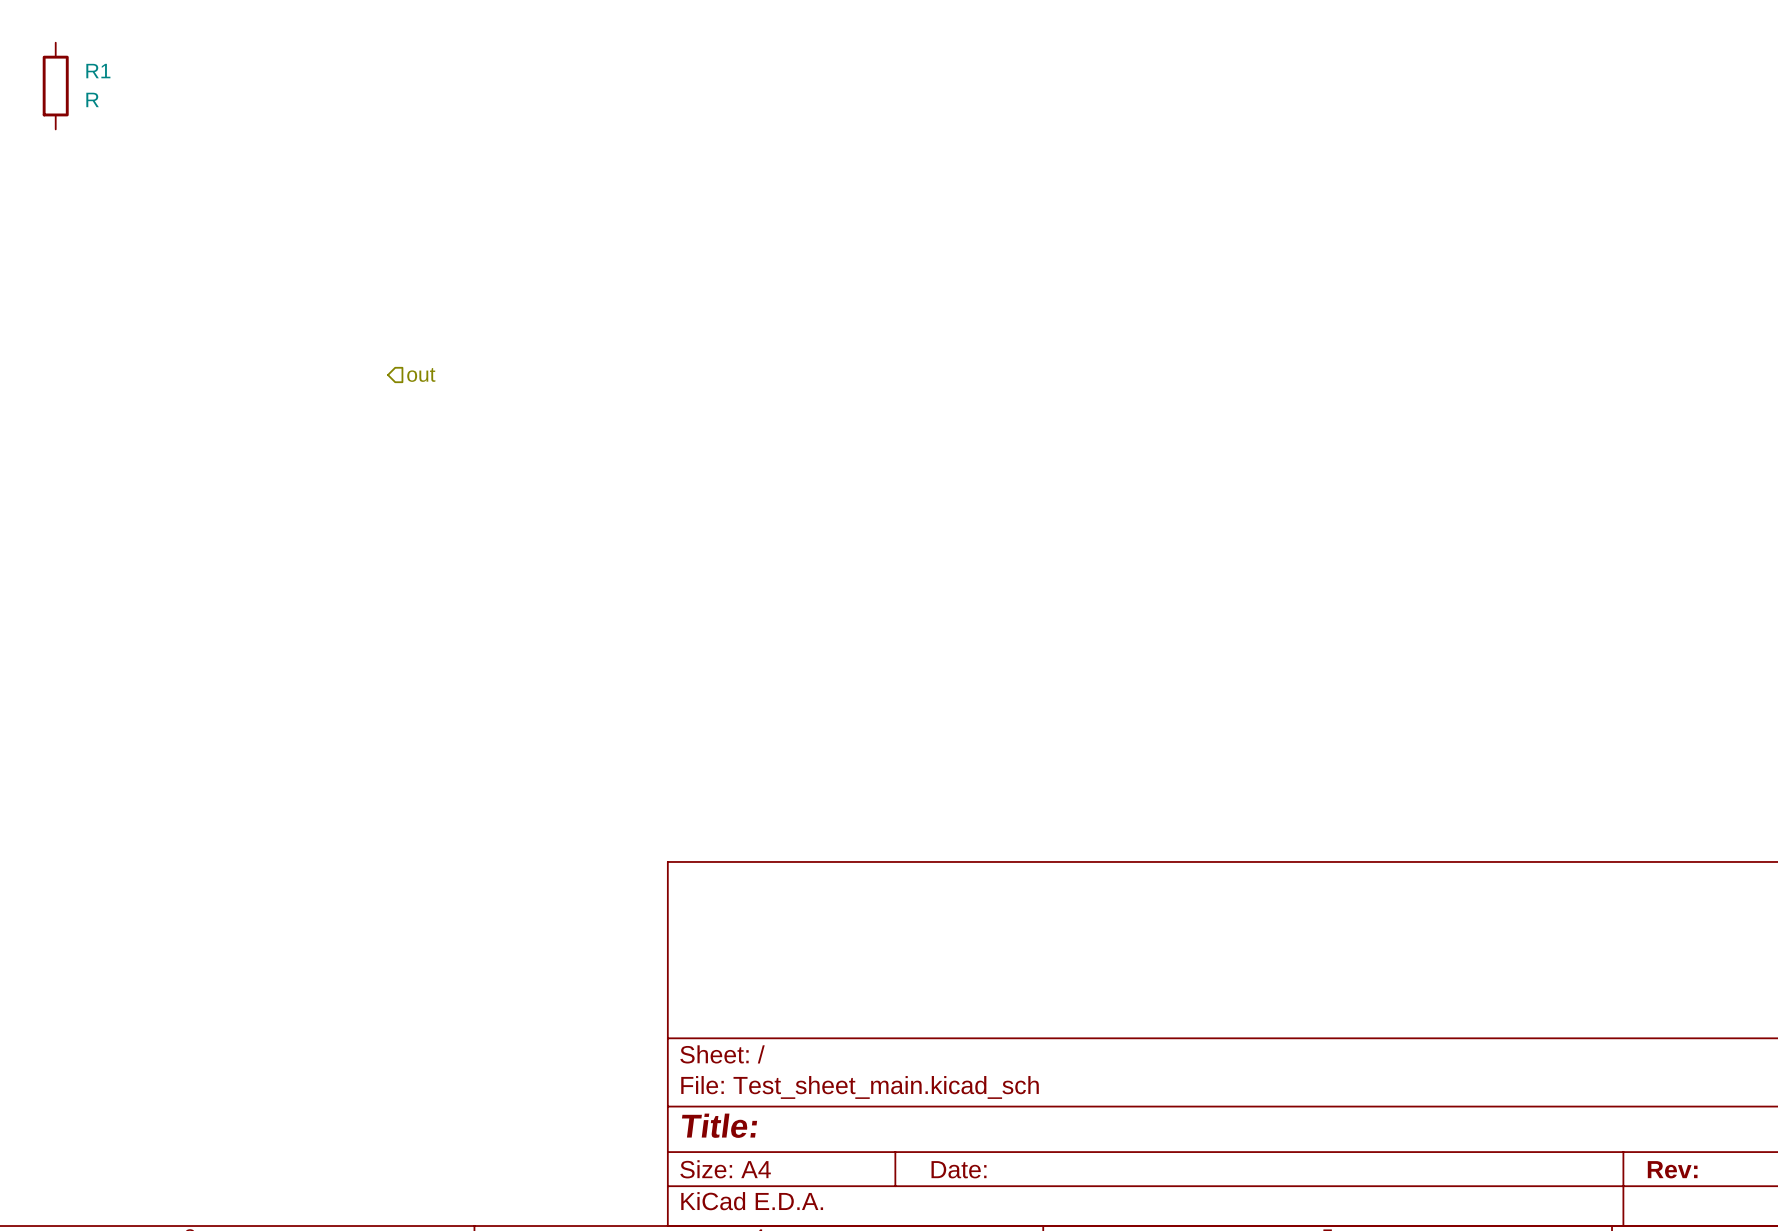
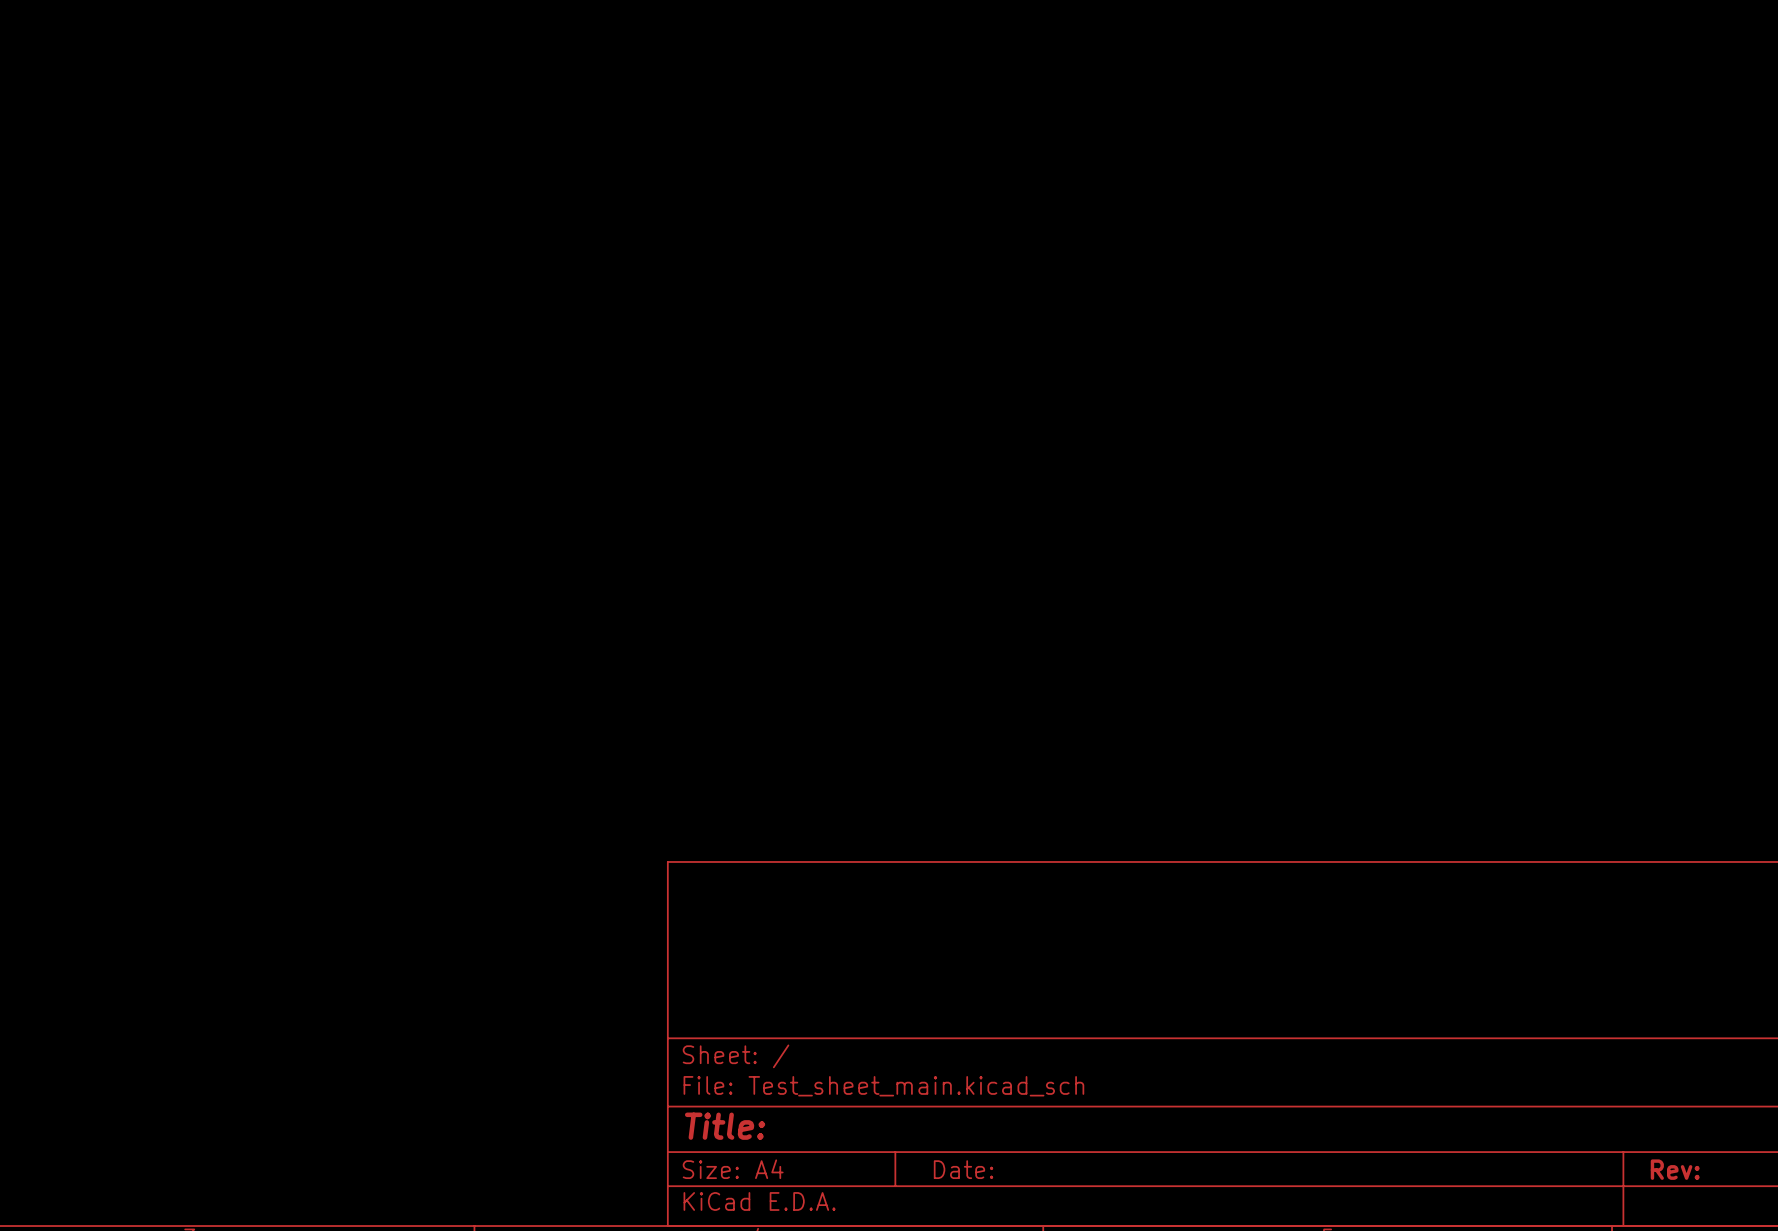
R1: R (55, 86) -> none
hierarchical label: out (421, 374) -> none

